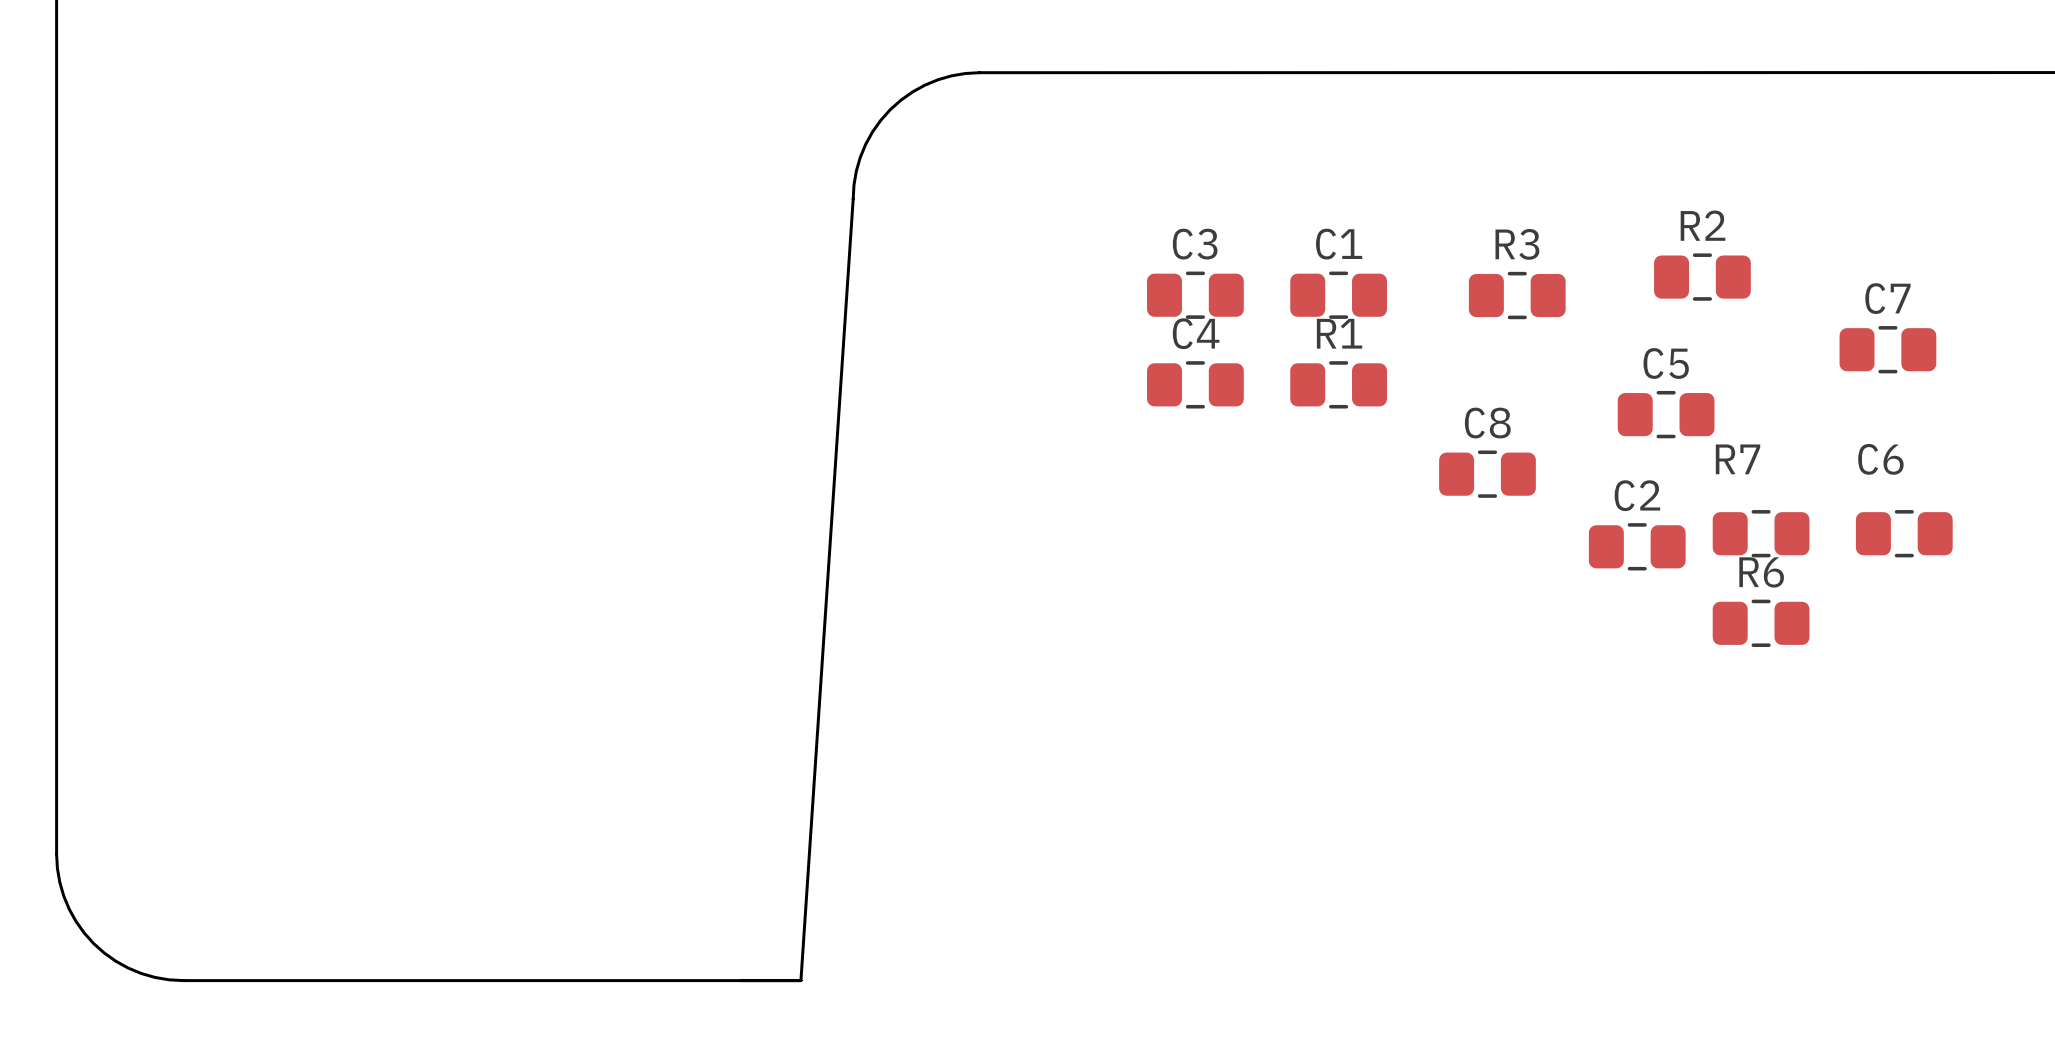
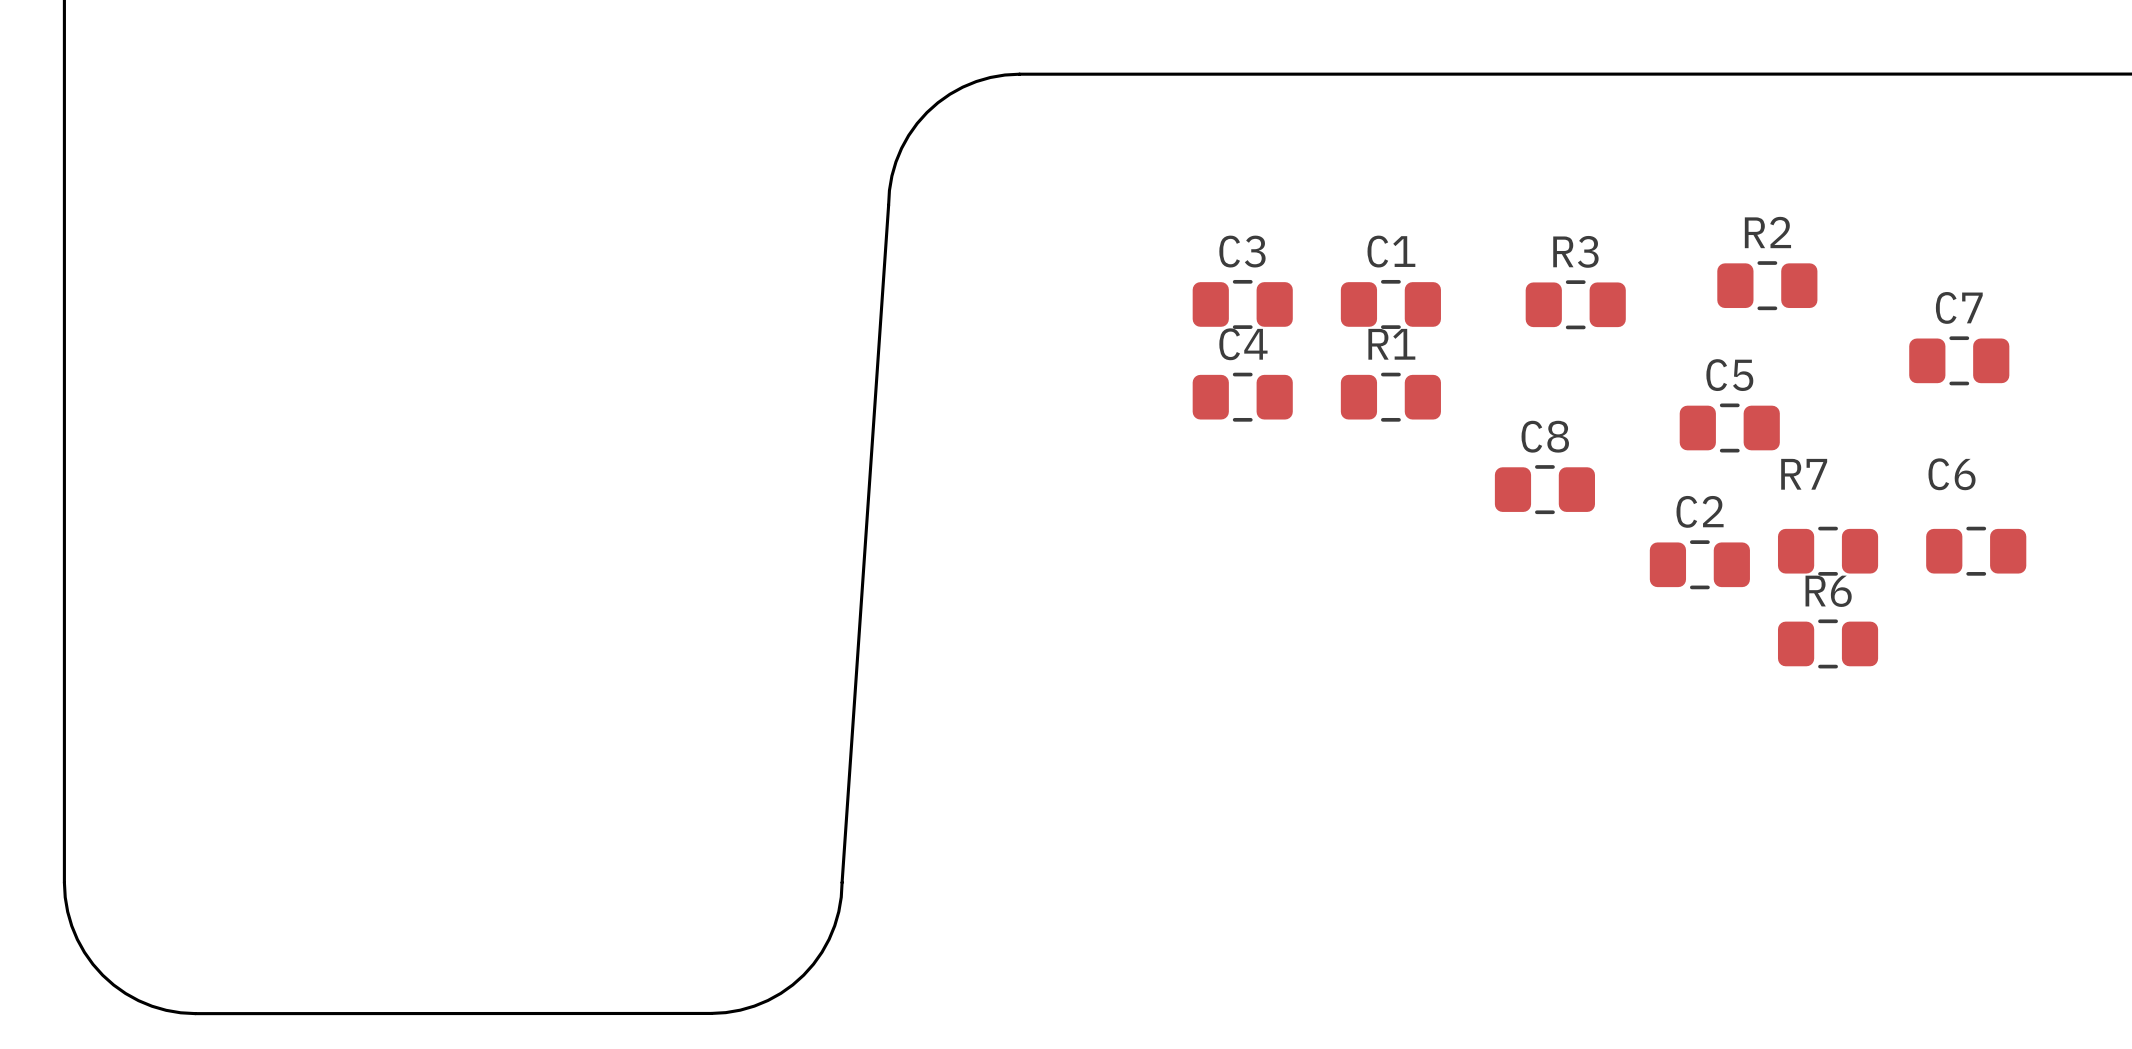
board edge: (853, 199) (800, 980) (183, 980) -> (888, 205) (841, 897) (834, 925) (822, 952) (813, 964) (803, 975) (780, 993) (754, 1006) (725, 1012) (195, 1013)

